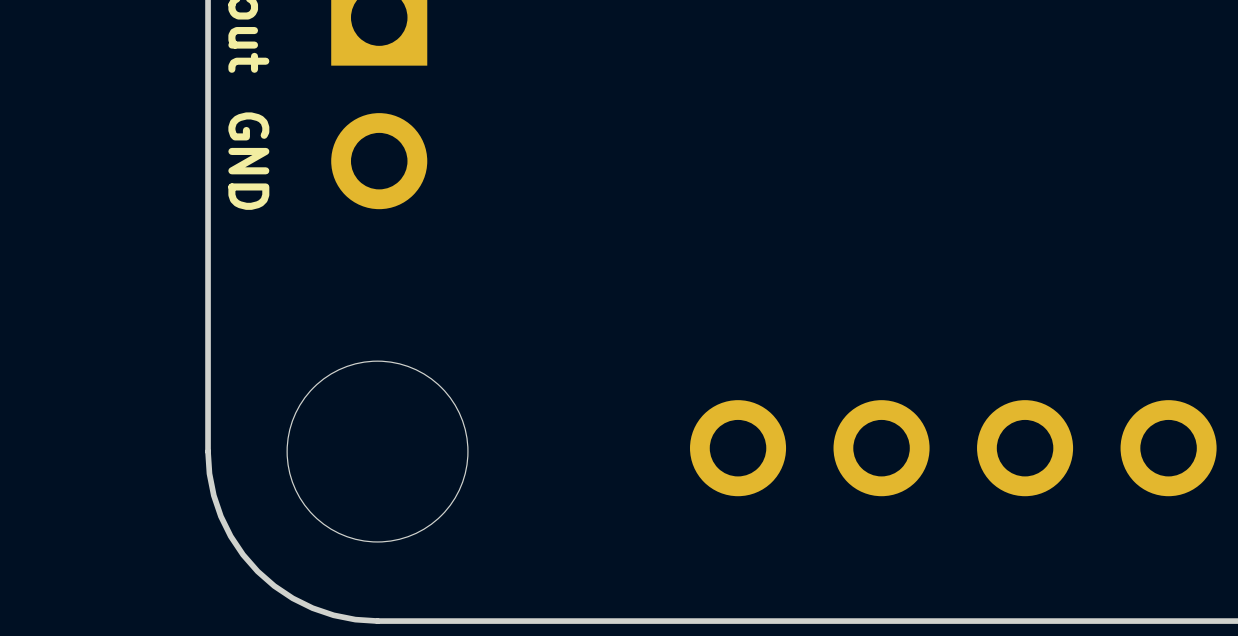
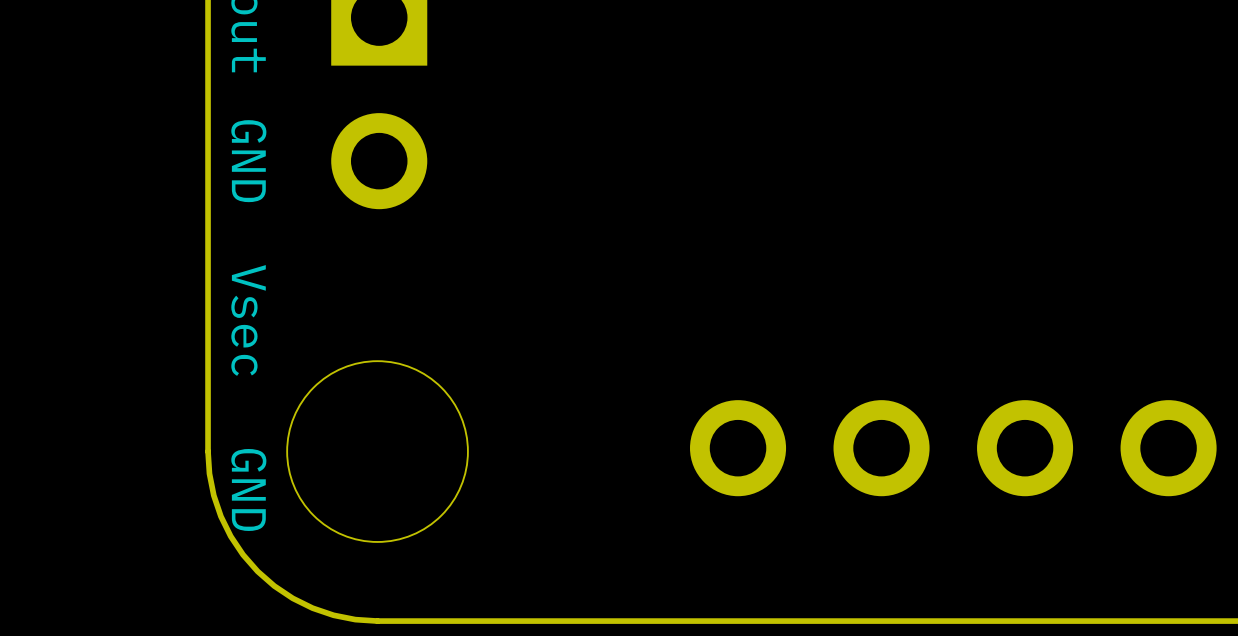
text: none -> Vsec (248, 320)
text: none -> GND (248, 489)

